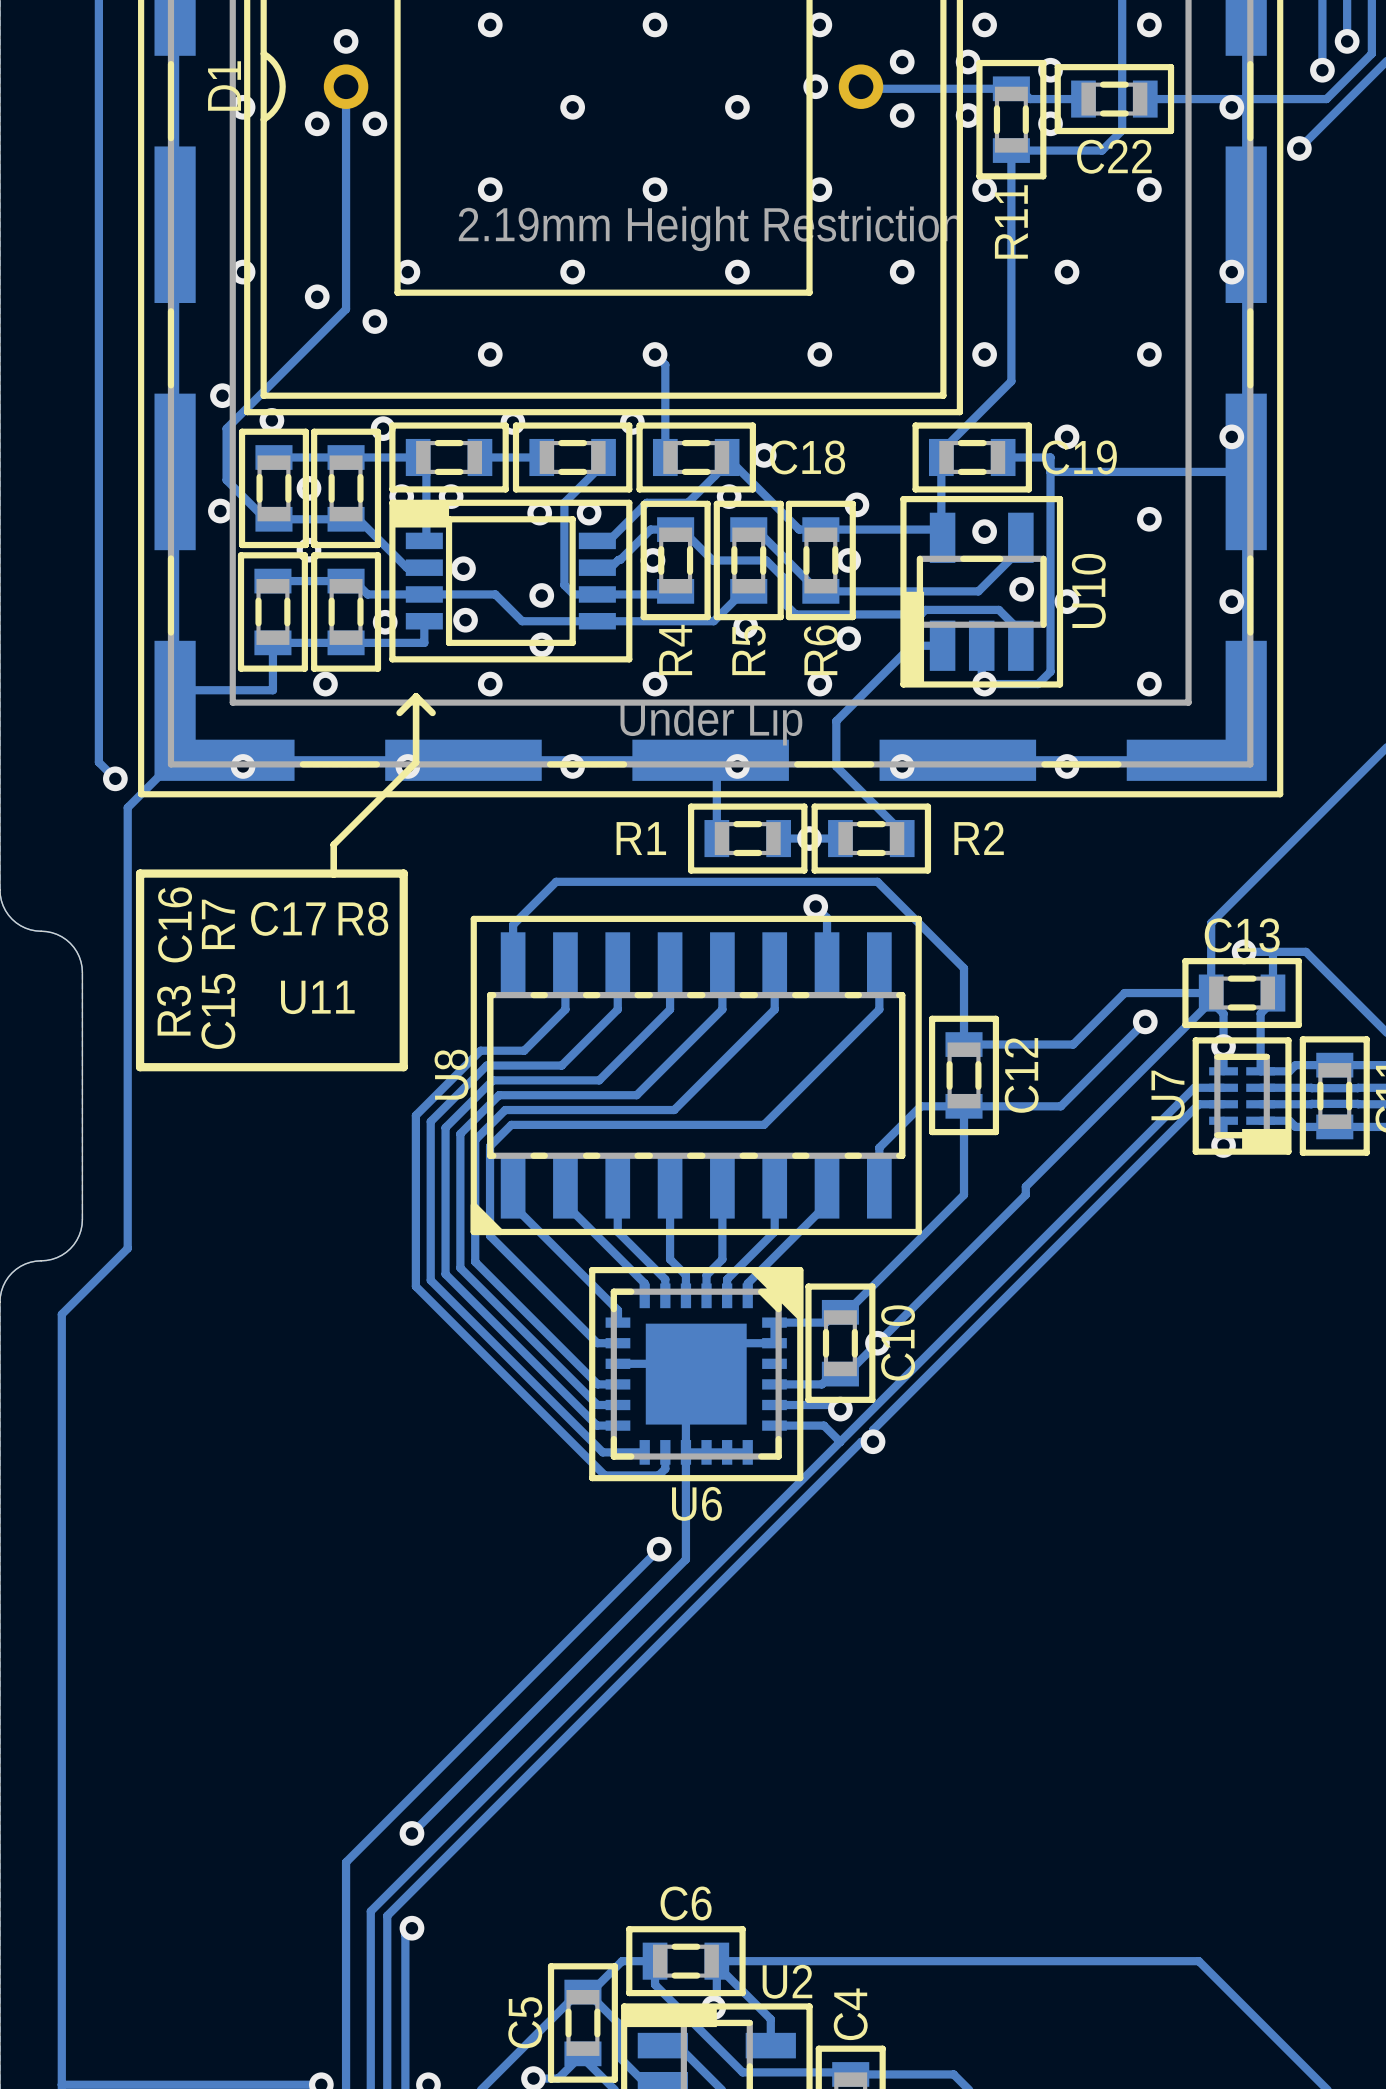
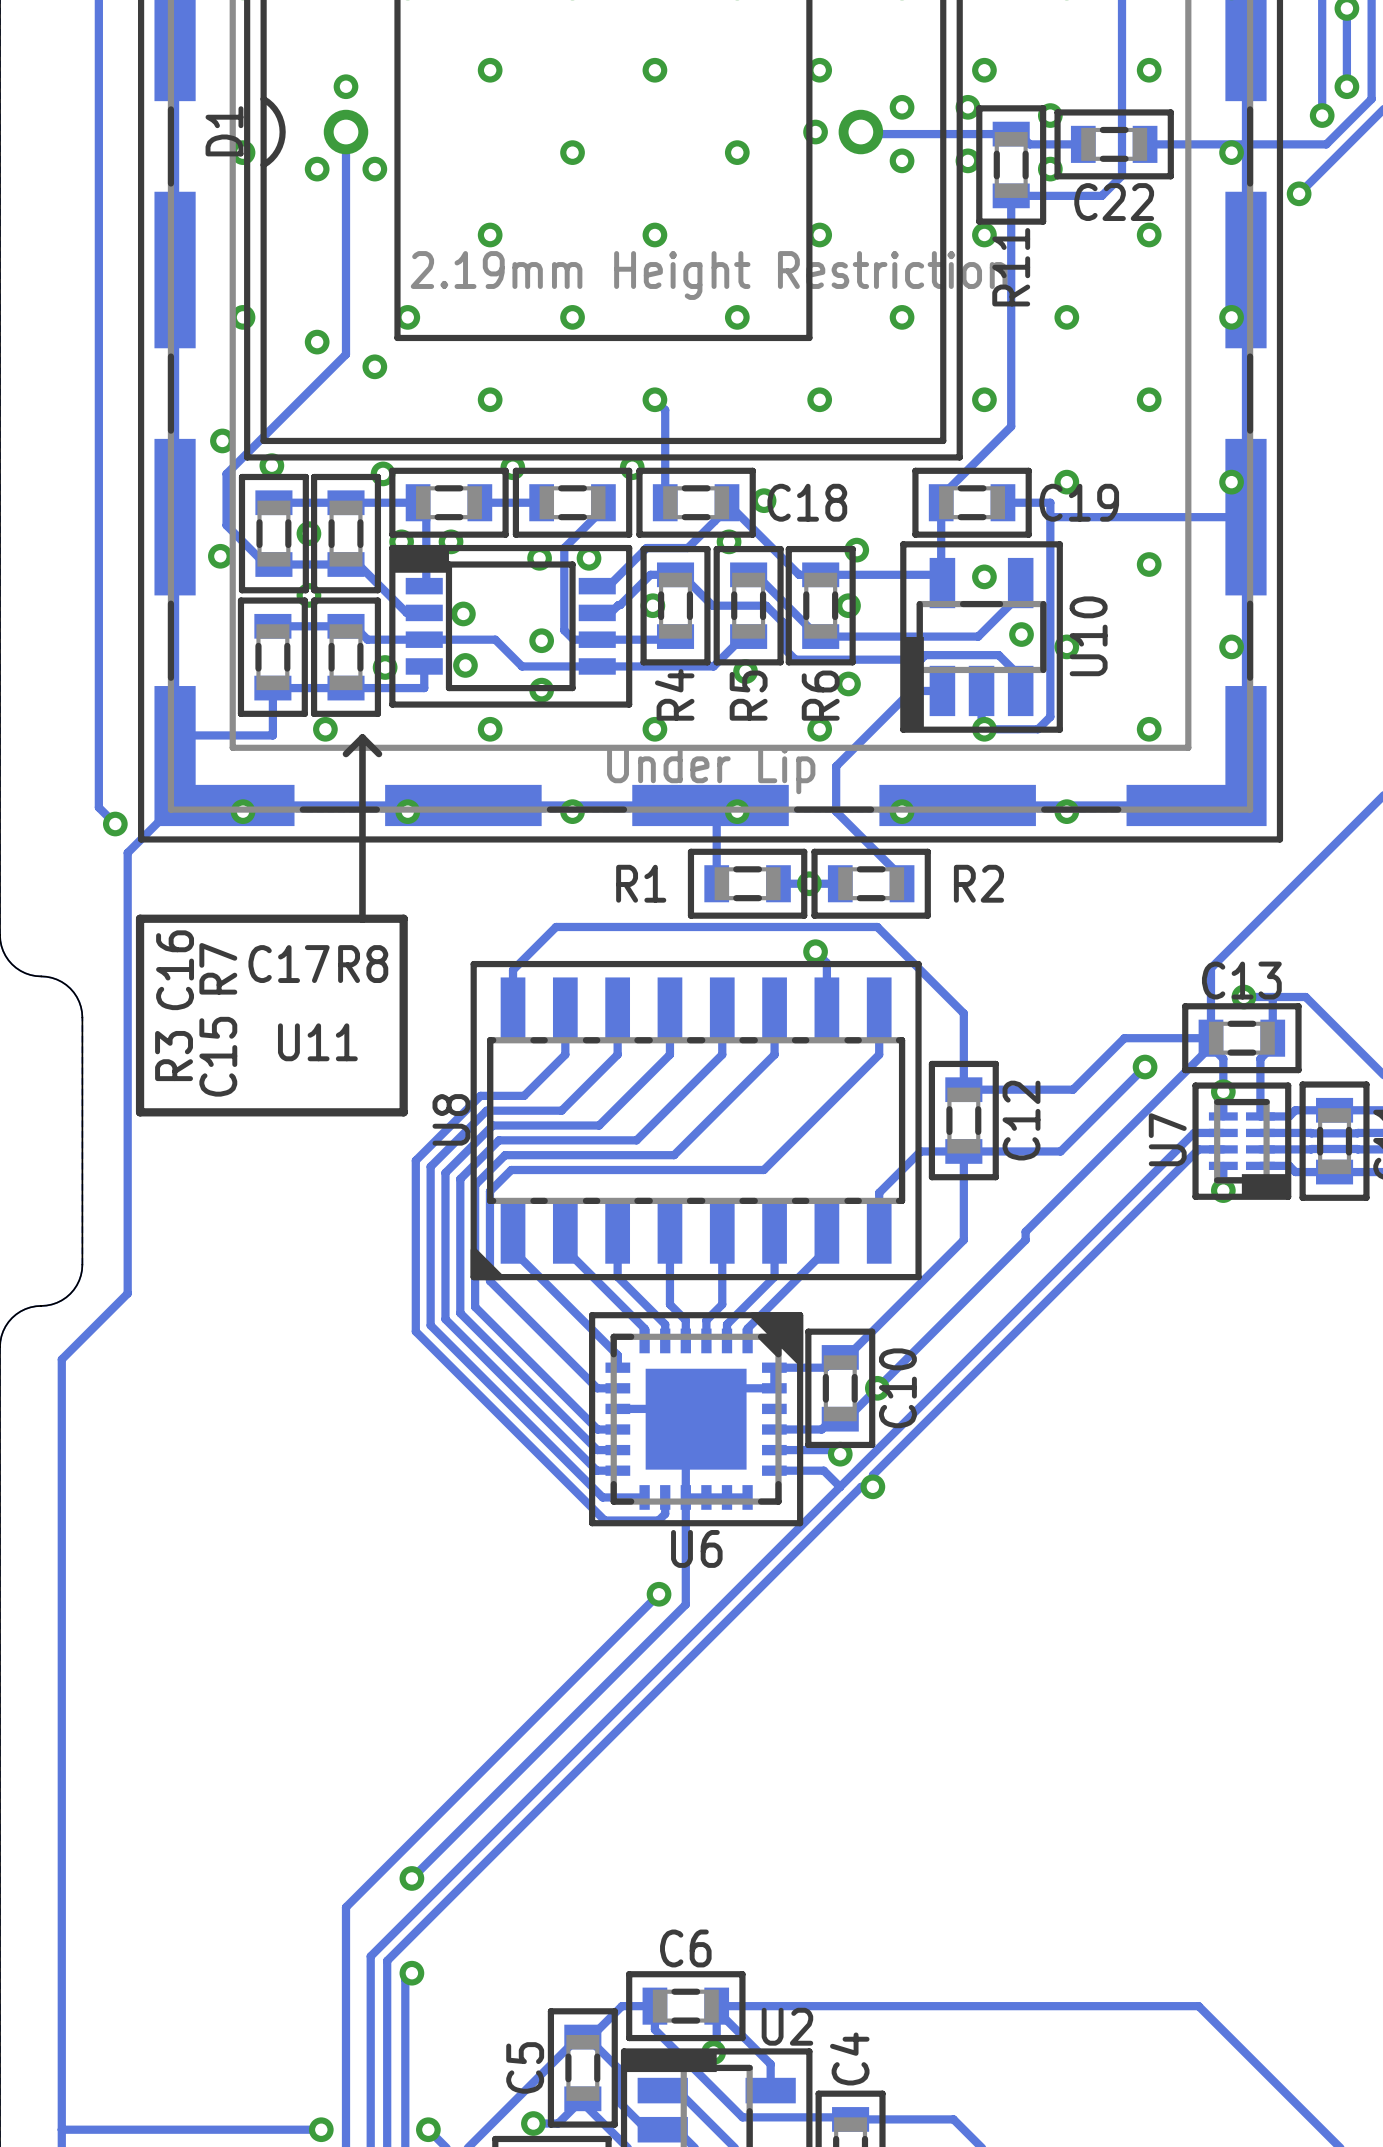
line: none -> (362, 737) (362, 918)
line: (416, 696) (399, 712) -> (362, 737) (346, 753)
line: (416, 696) (432, 712) -> (362, 737) (378, 753)
line: (416, 696) (416, 762) (333, 844) (333, 873) -> none

